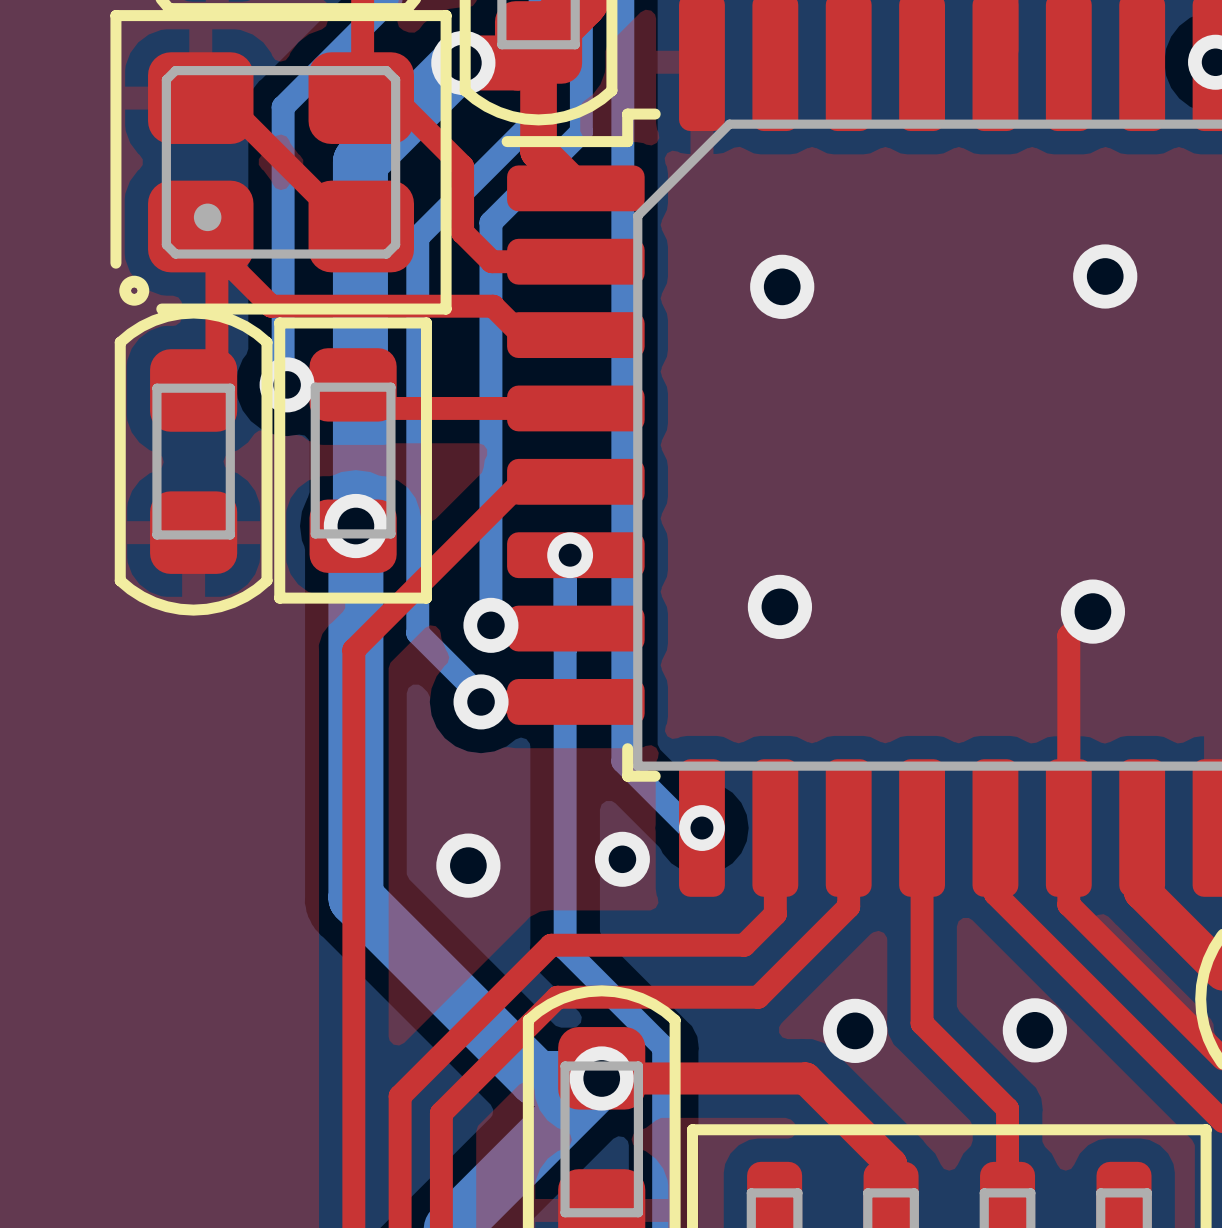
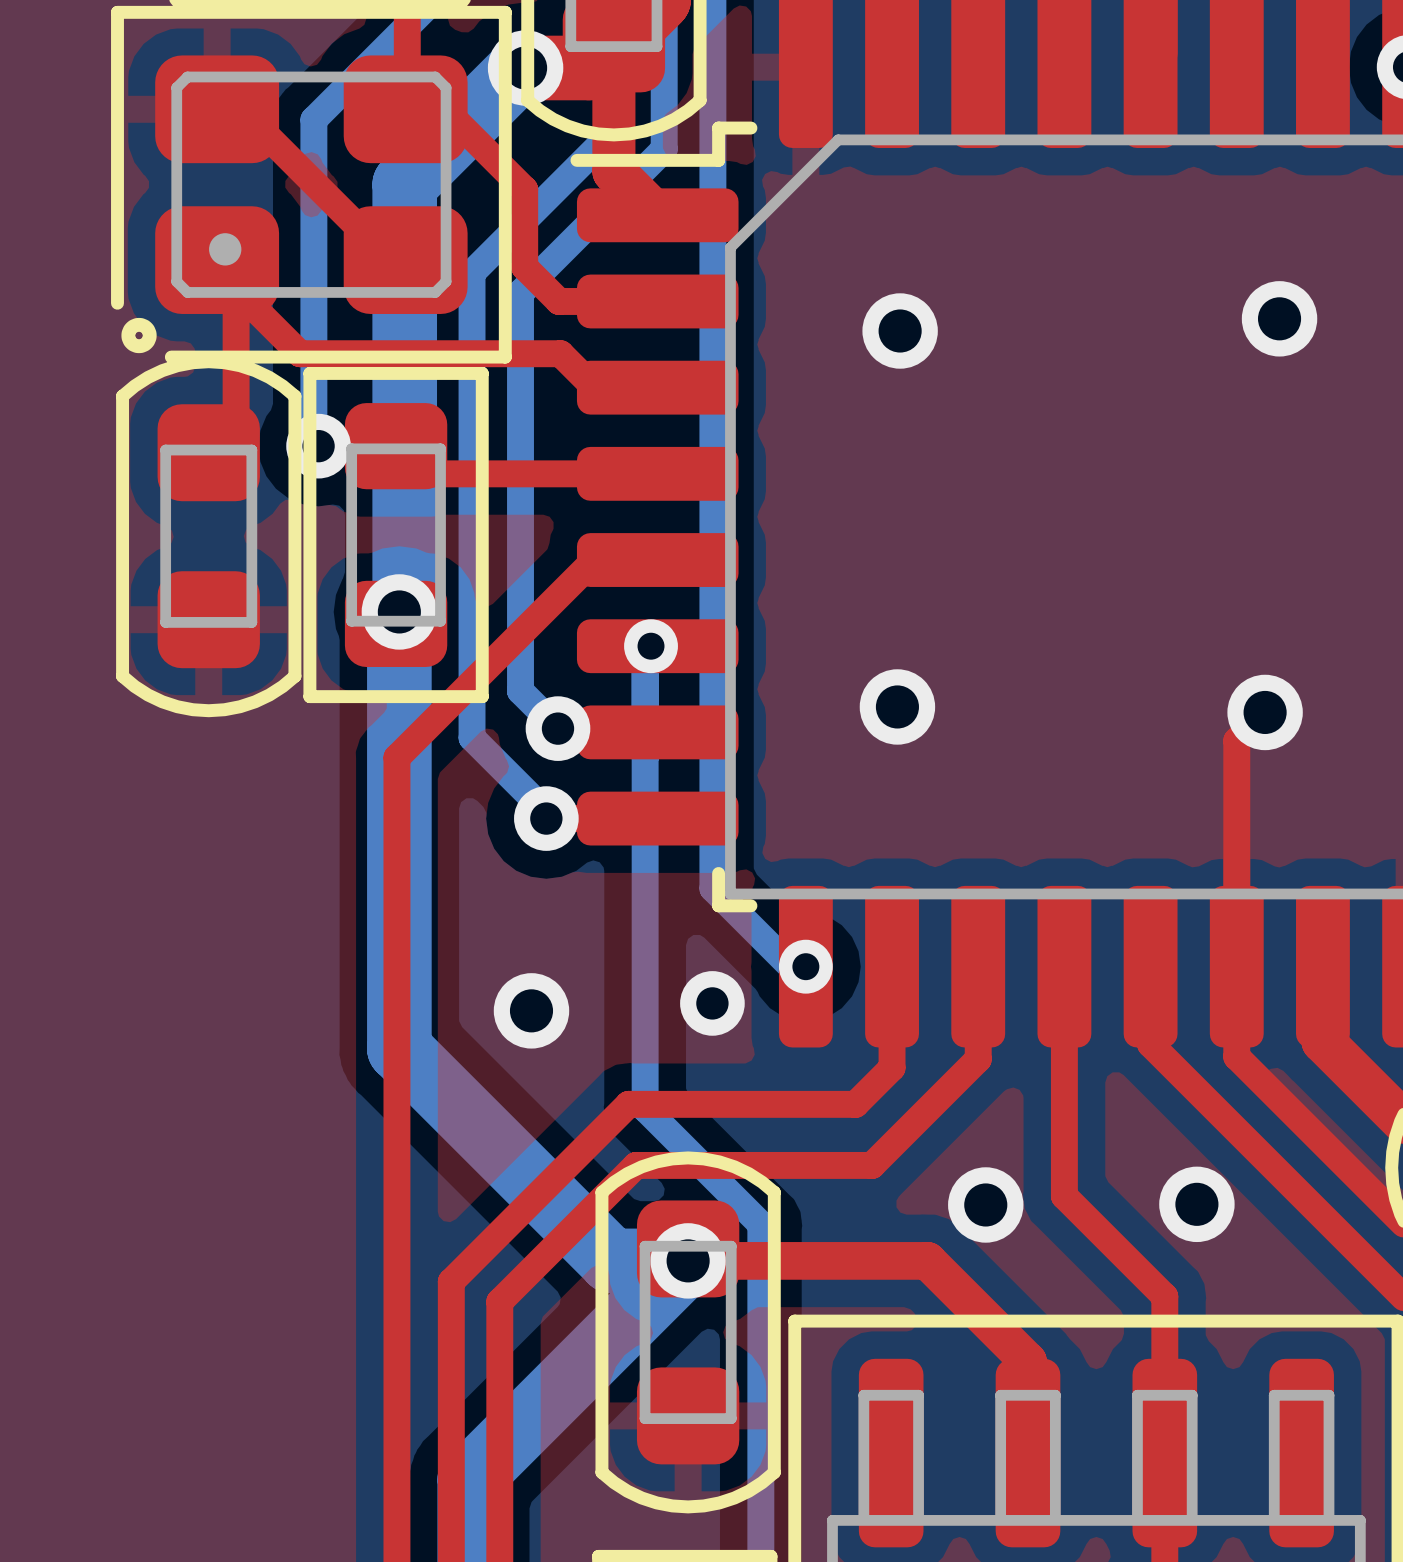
bottom track: (490, 222) (490, 625) -> (557, 255) (520, 292) (520, 691) (557, 728)

